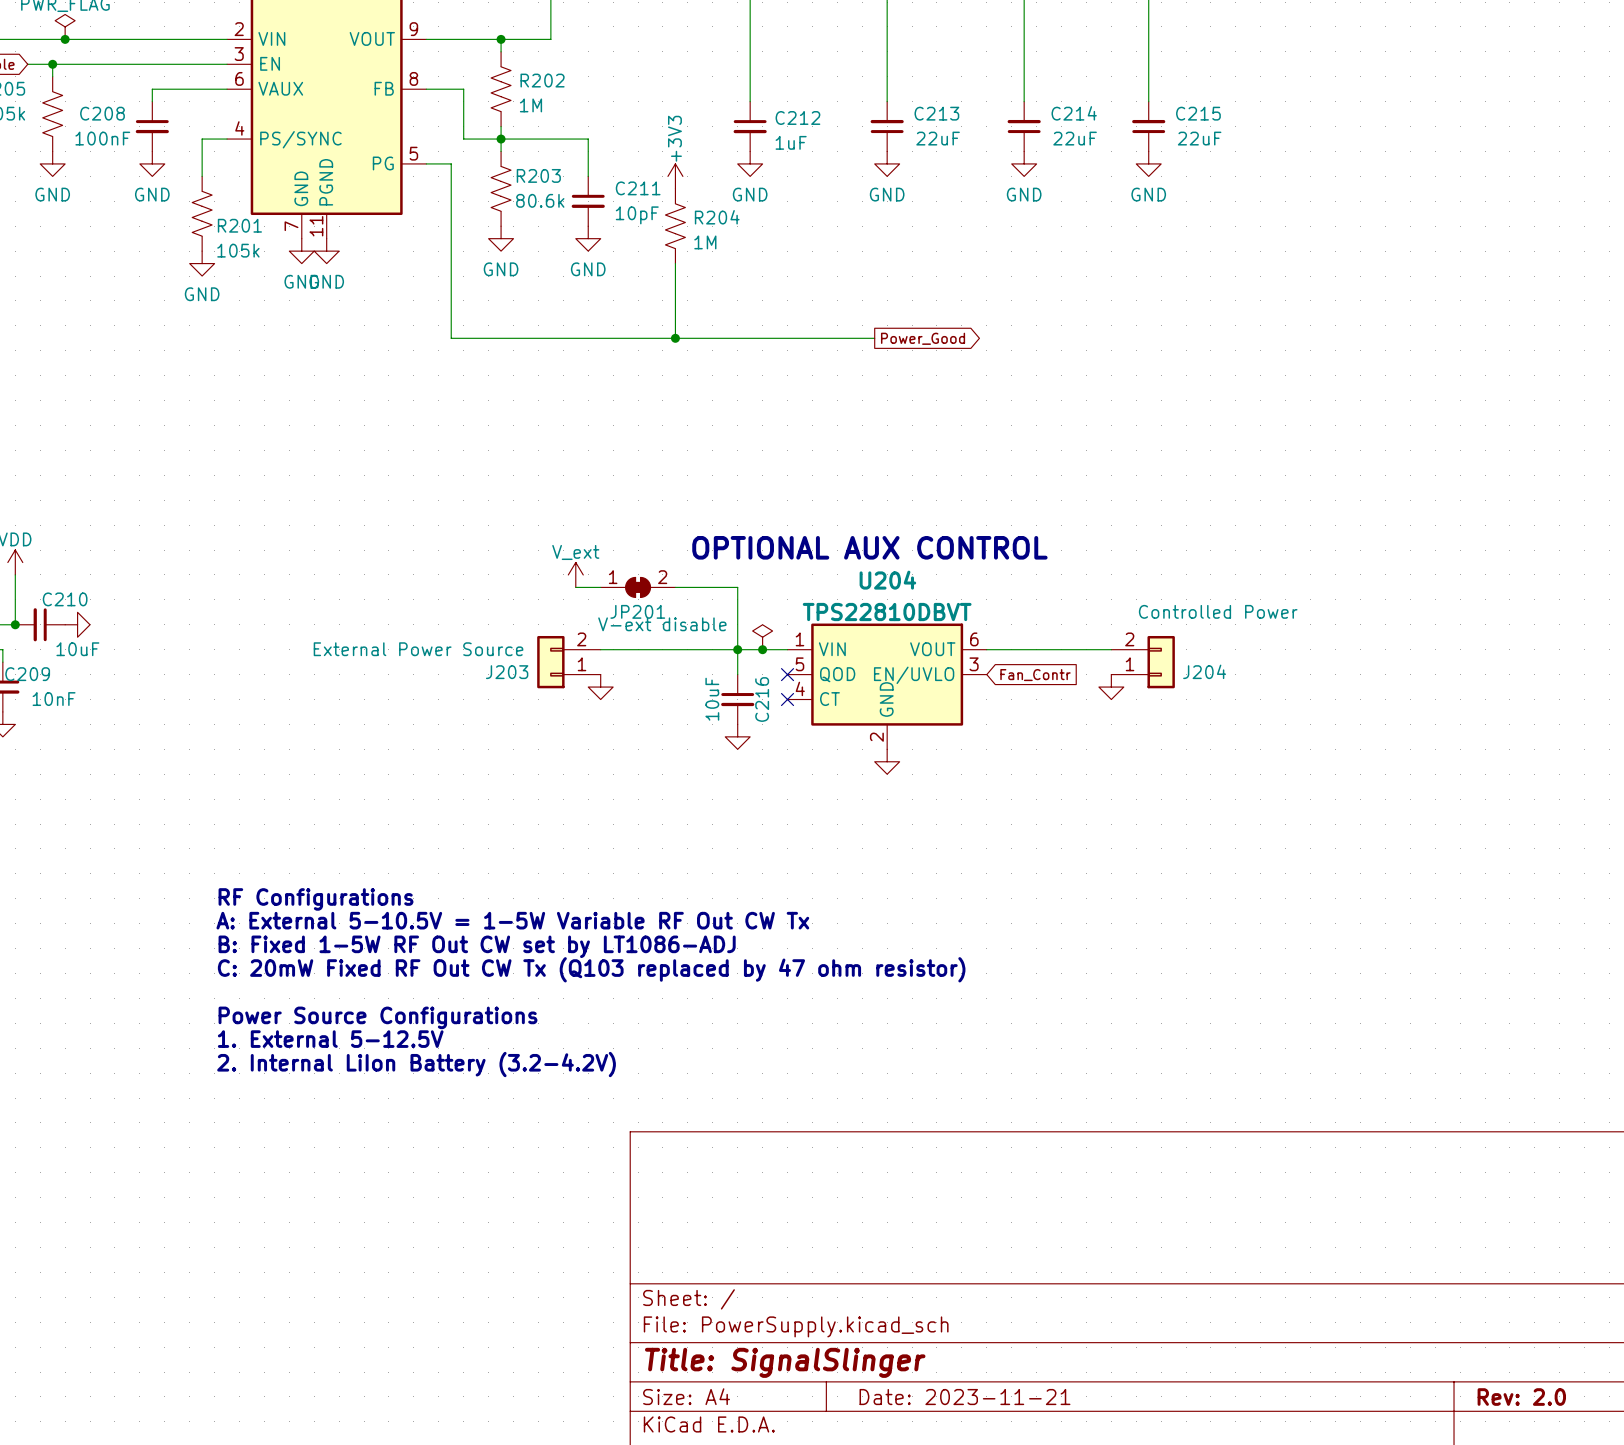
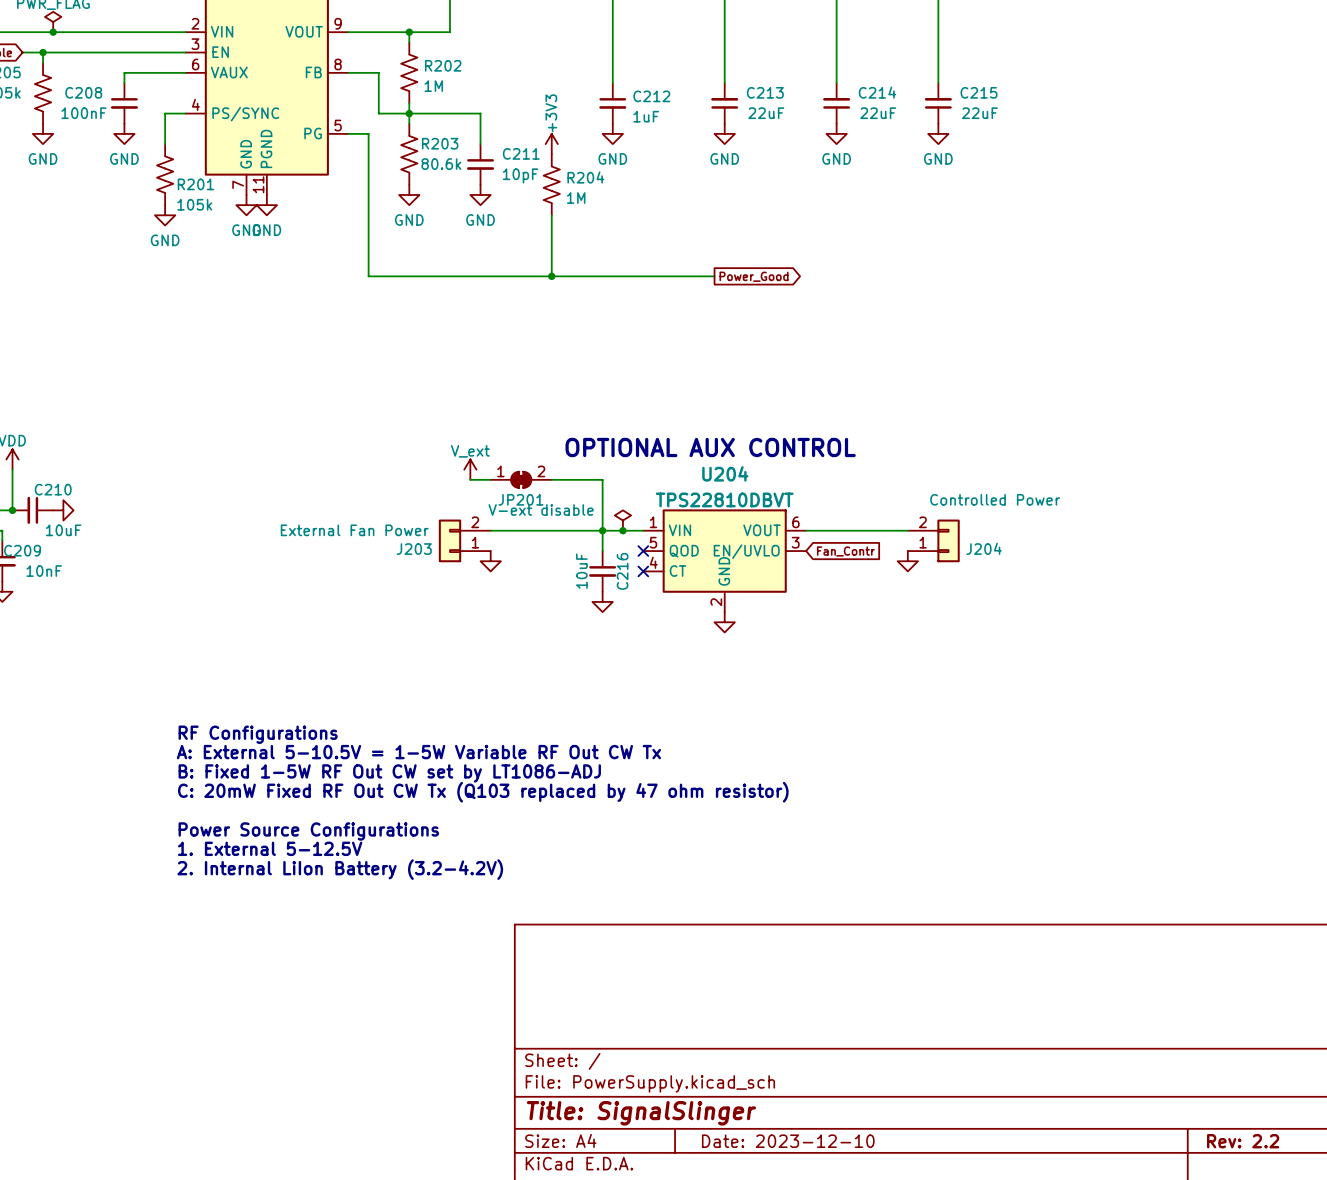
J203 value: External Power Source (418, 649) -> External Fan Power (354, 530)
title block: Date: 2023-11-21 (964, 1397) -> Date: 2023-12-10 (788, 1141)
title block: Rev: 2.0 (1521, 1397) -> Rev: 2.2 (1243, 1141)

